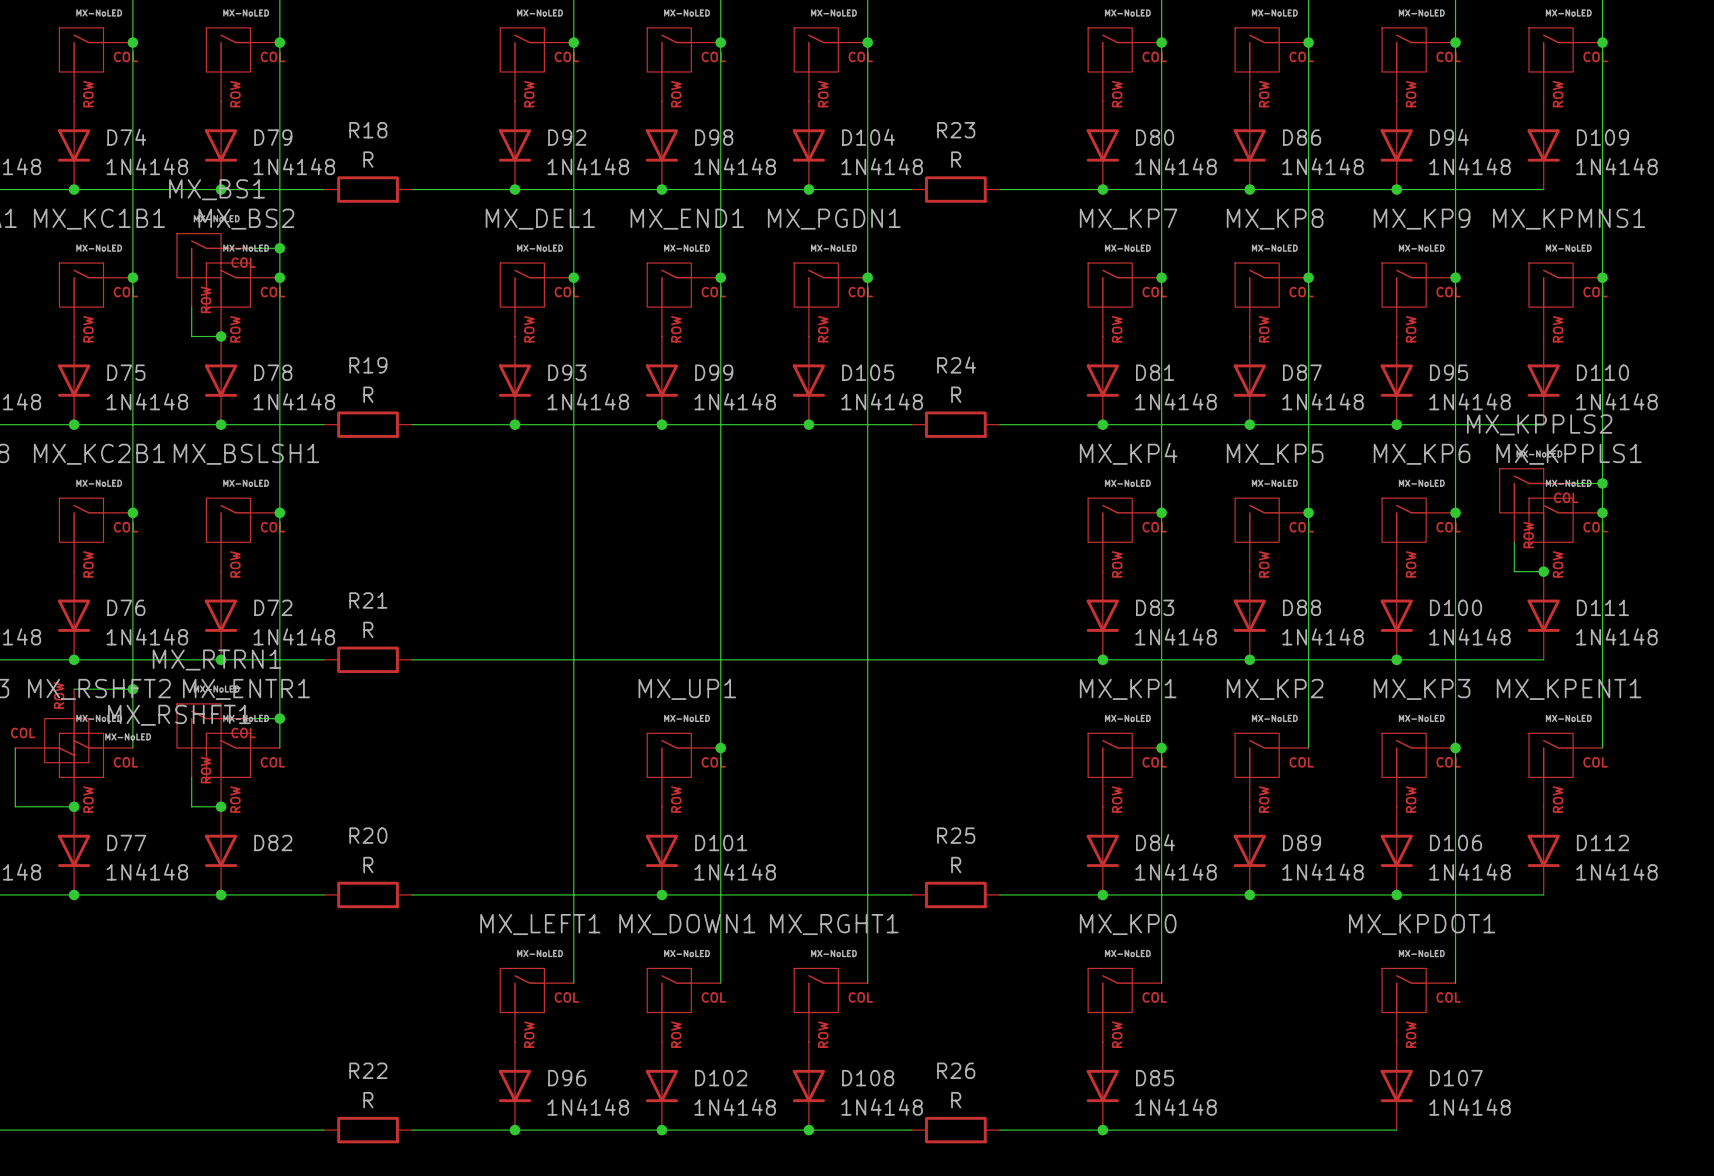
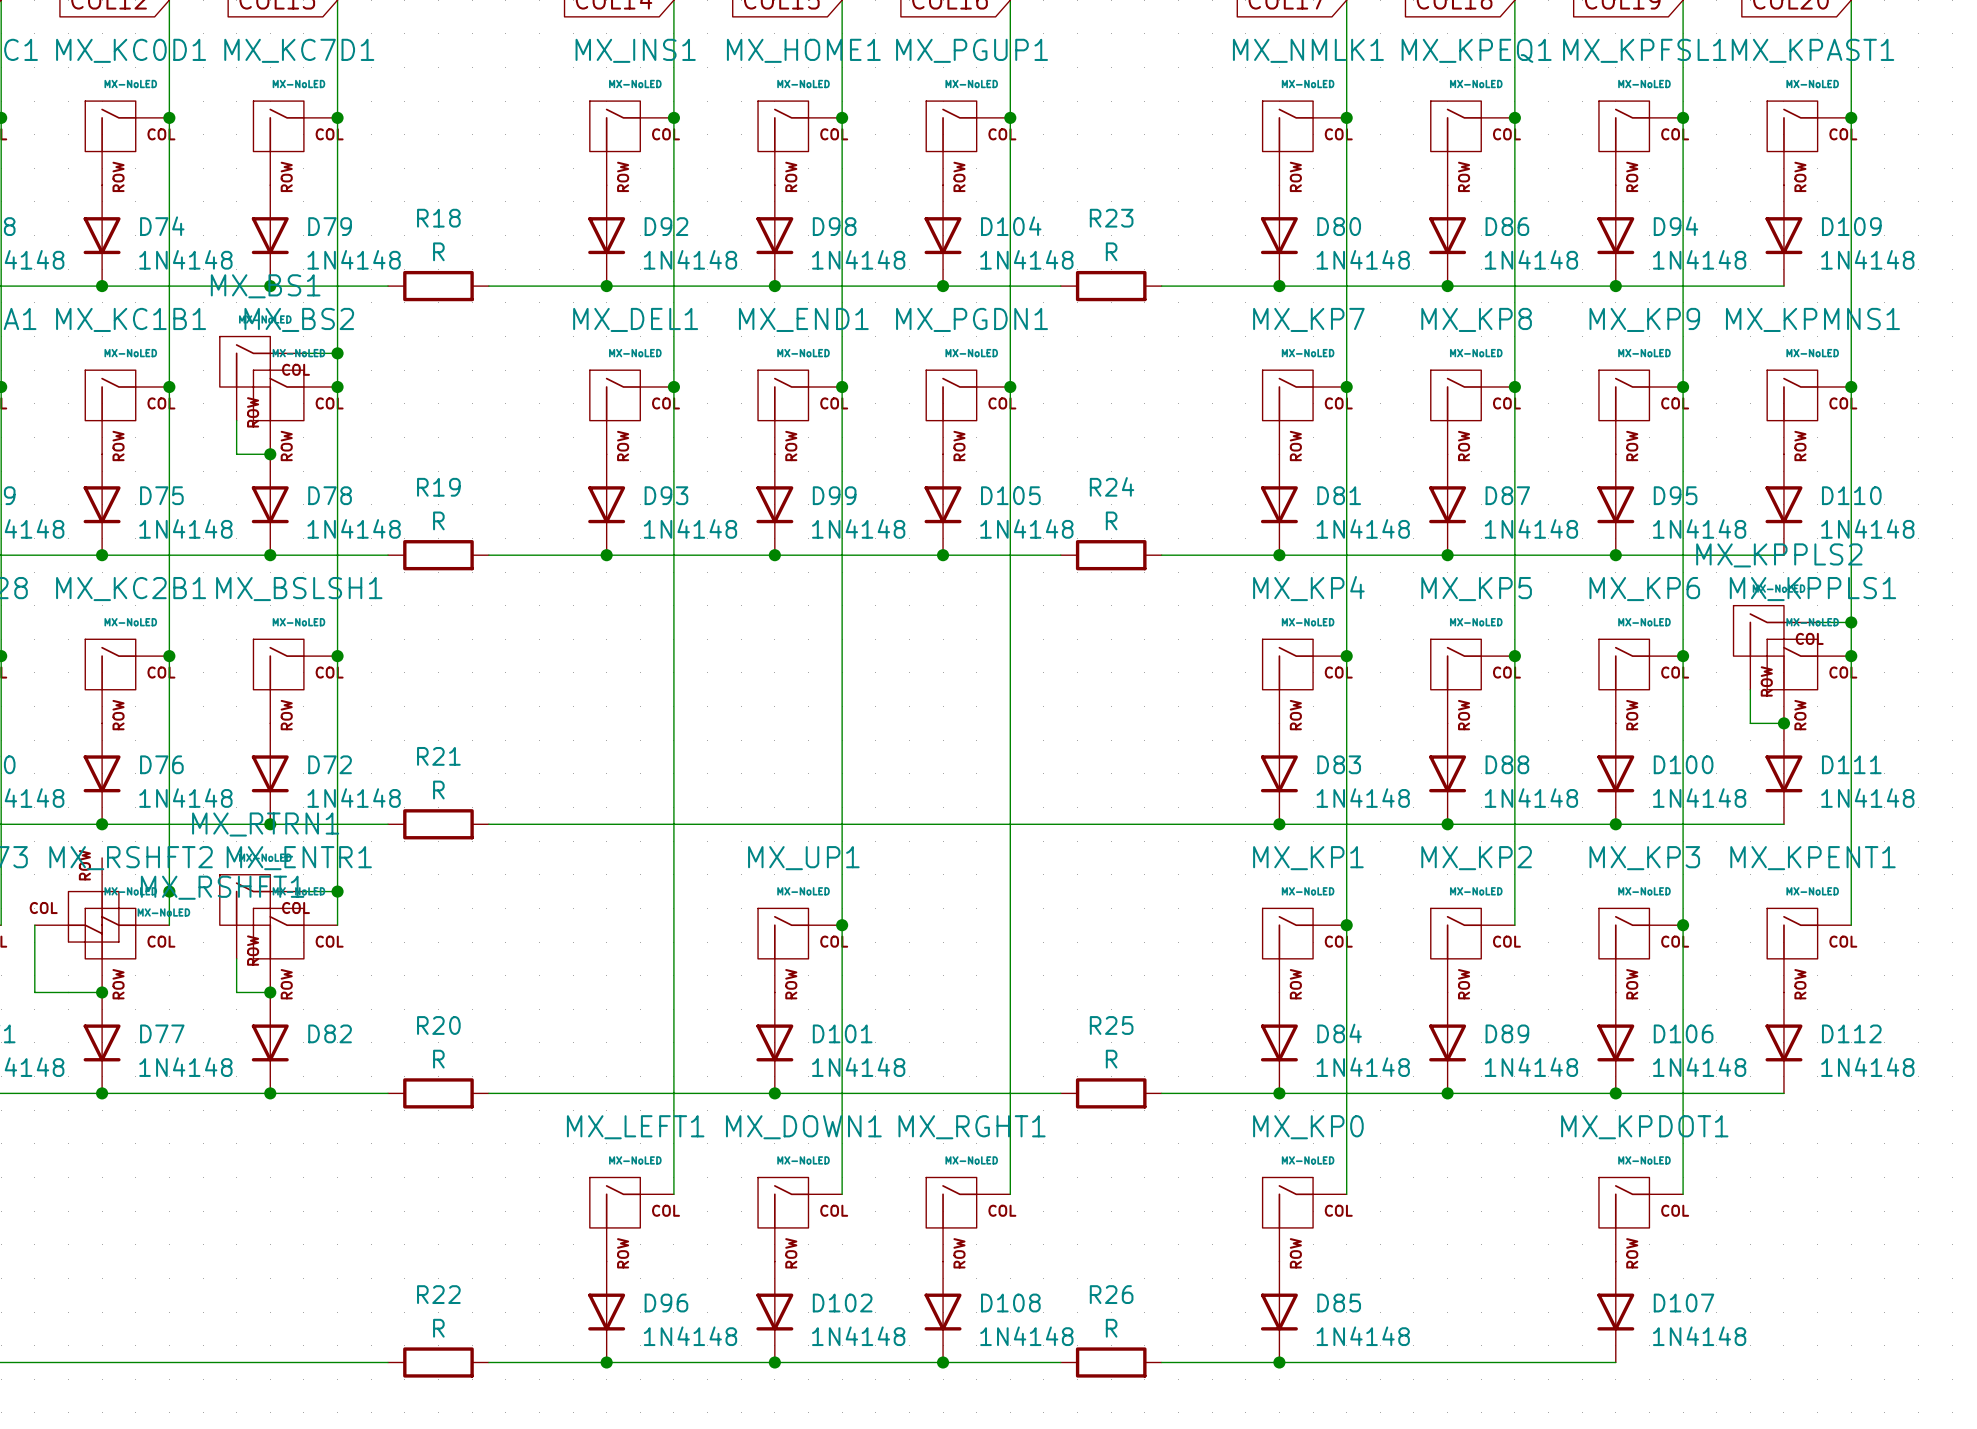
wire: (74, 689) (132, 689) -> none
junction position: (132, 689) -> (169, 891)

